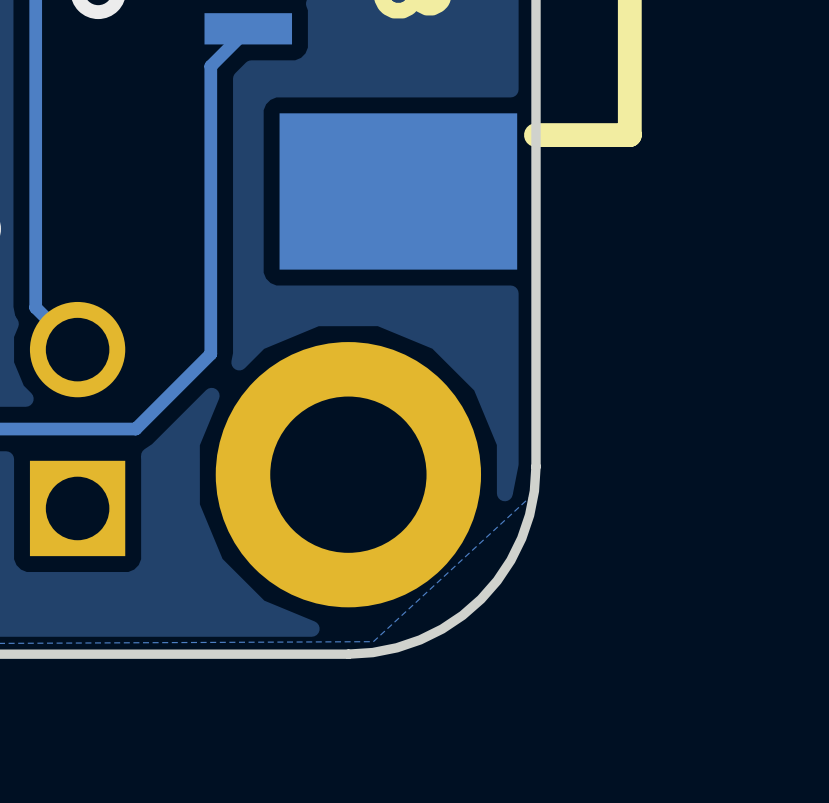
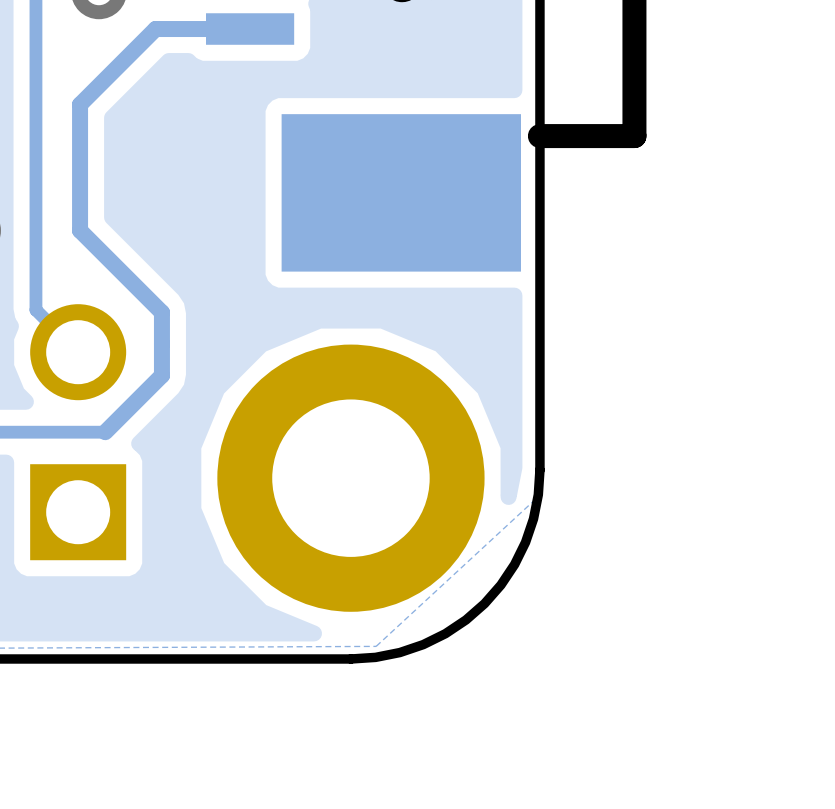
track: (248, 28) (210, 66) (210, 353) (135, 429) (104, 429) -> (250, 29) (155, 29) (80, 104) (80, 230) (161, 312) (161, 375) (105, 432)

